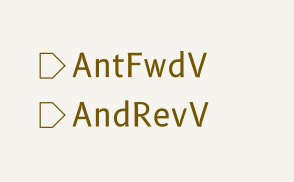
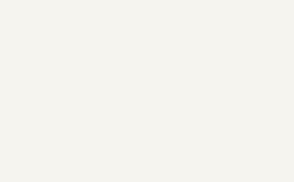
hierarchical label: AntFwdV (139, 64) -> none
hierarchical label: AndRevV (140, 113) -> none

